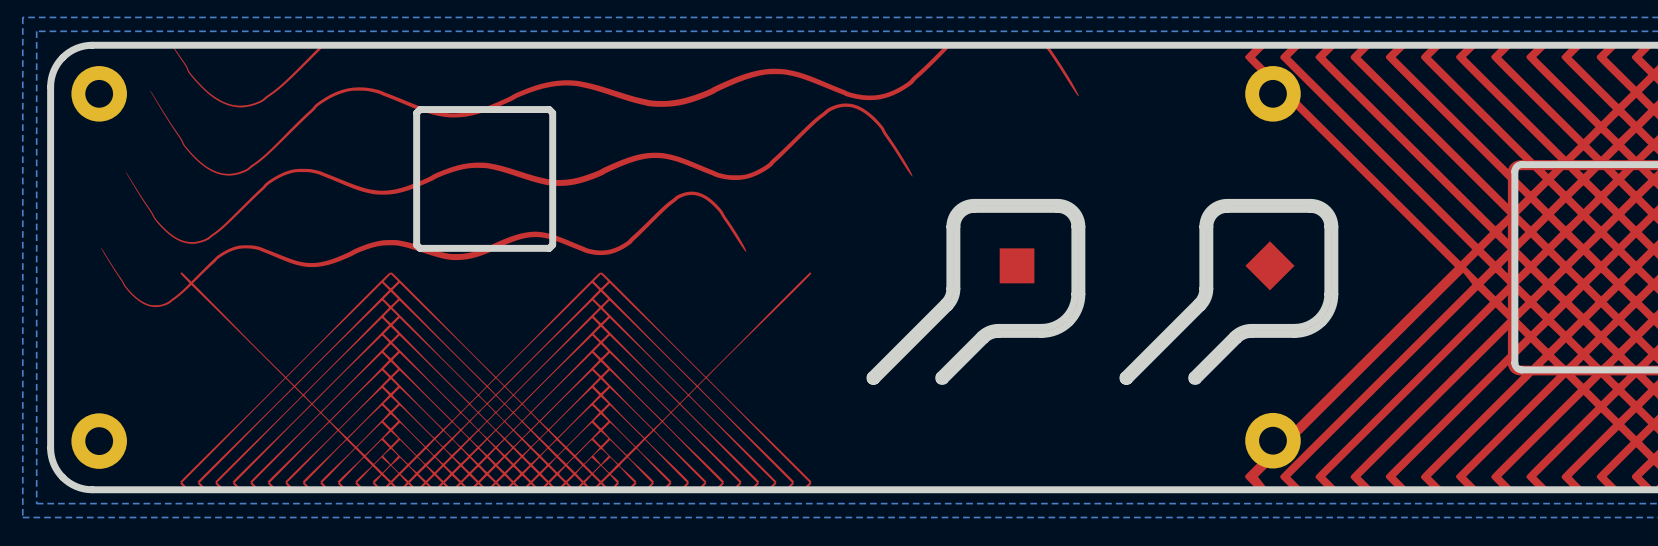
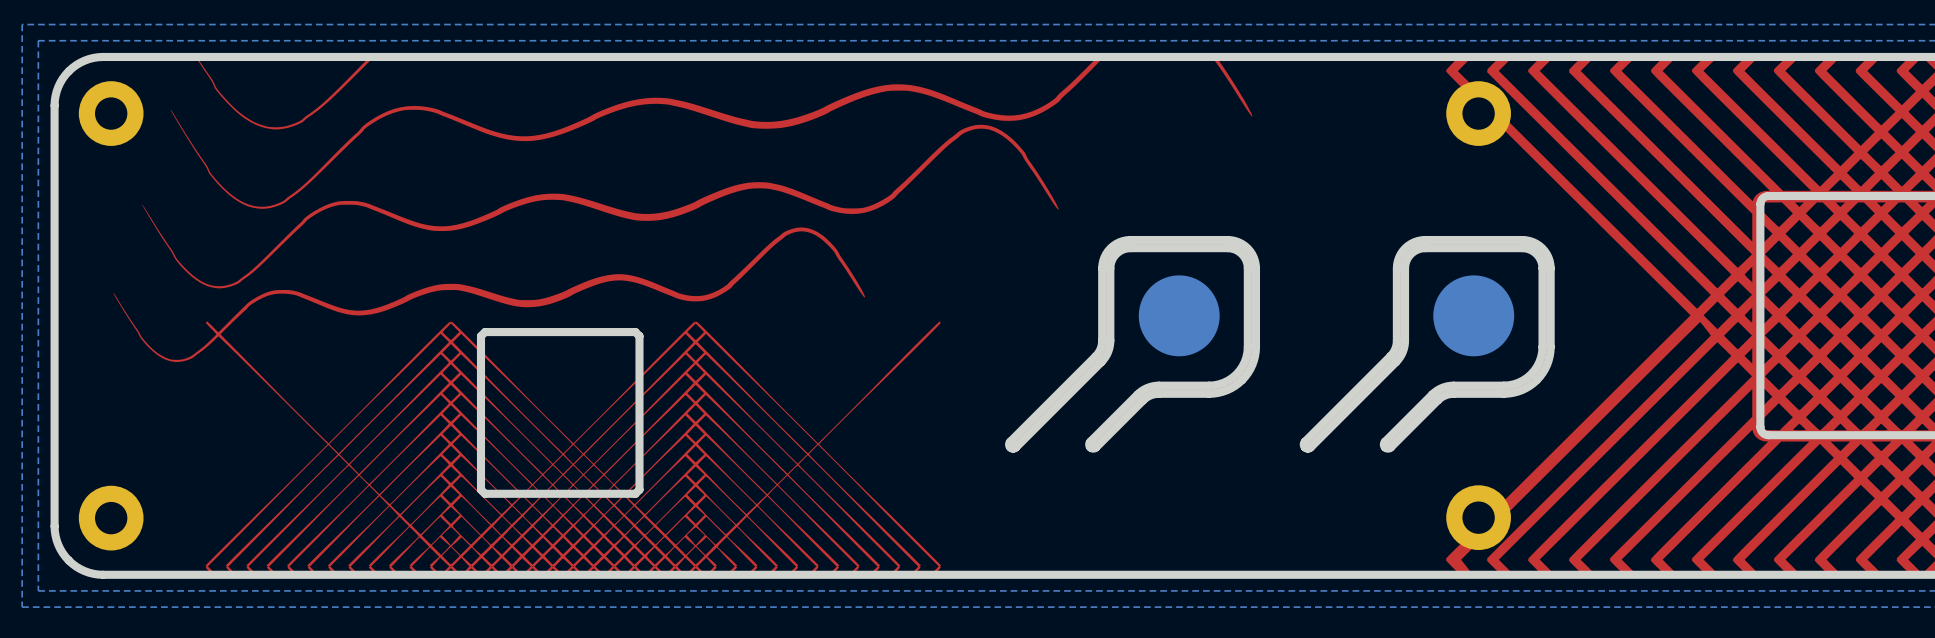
board edge: (549, 109) (420, 109) (416, 113) (416, 244) (420, 248) (549, 248) (552, 244) (552, 113) (549, 109) -> (635, 332) (485, 332) (480, 336) (480, 489) (485, 493) (635, 493) (639, 489) (639, 336) (635, 332)
part: none -> (1179, 315)
part: none -> (1473, 315)

